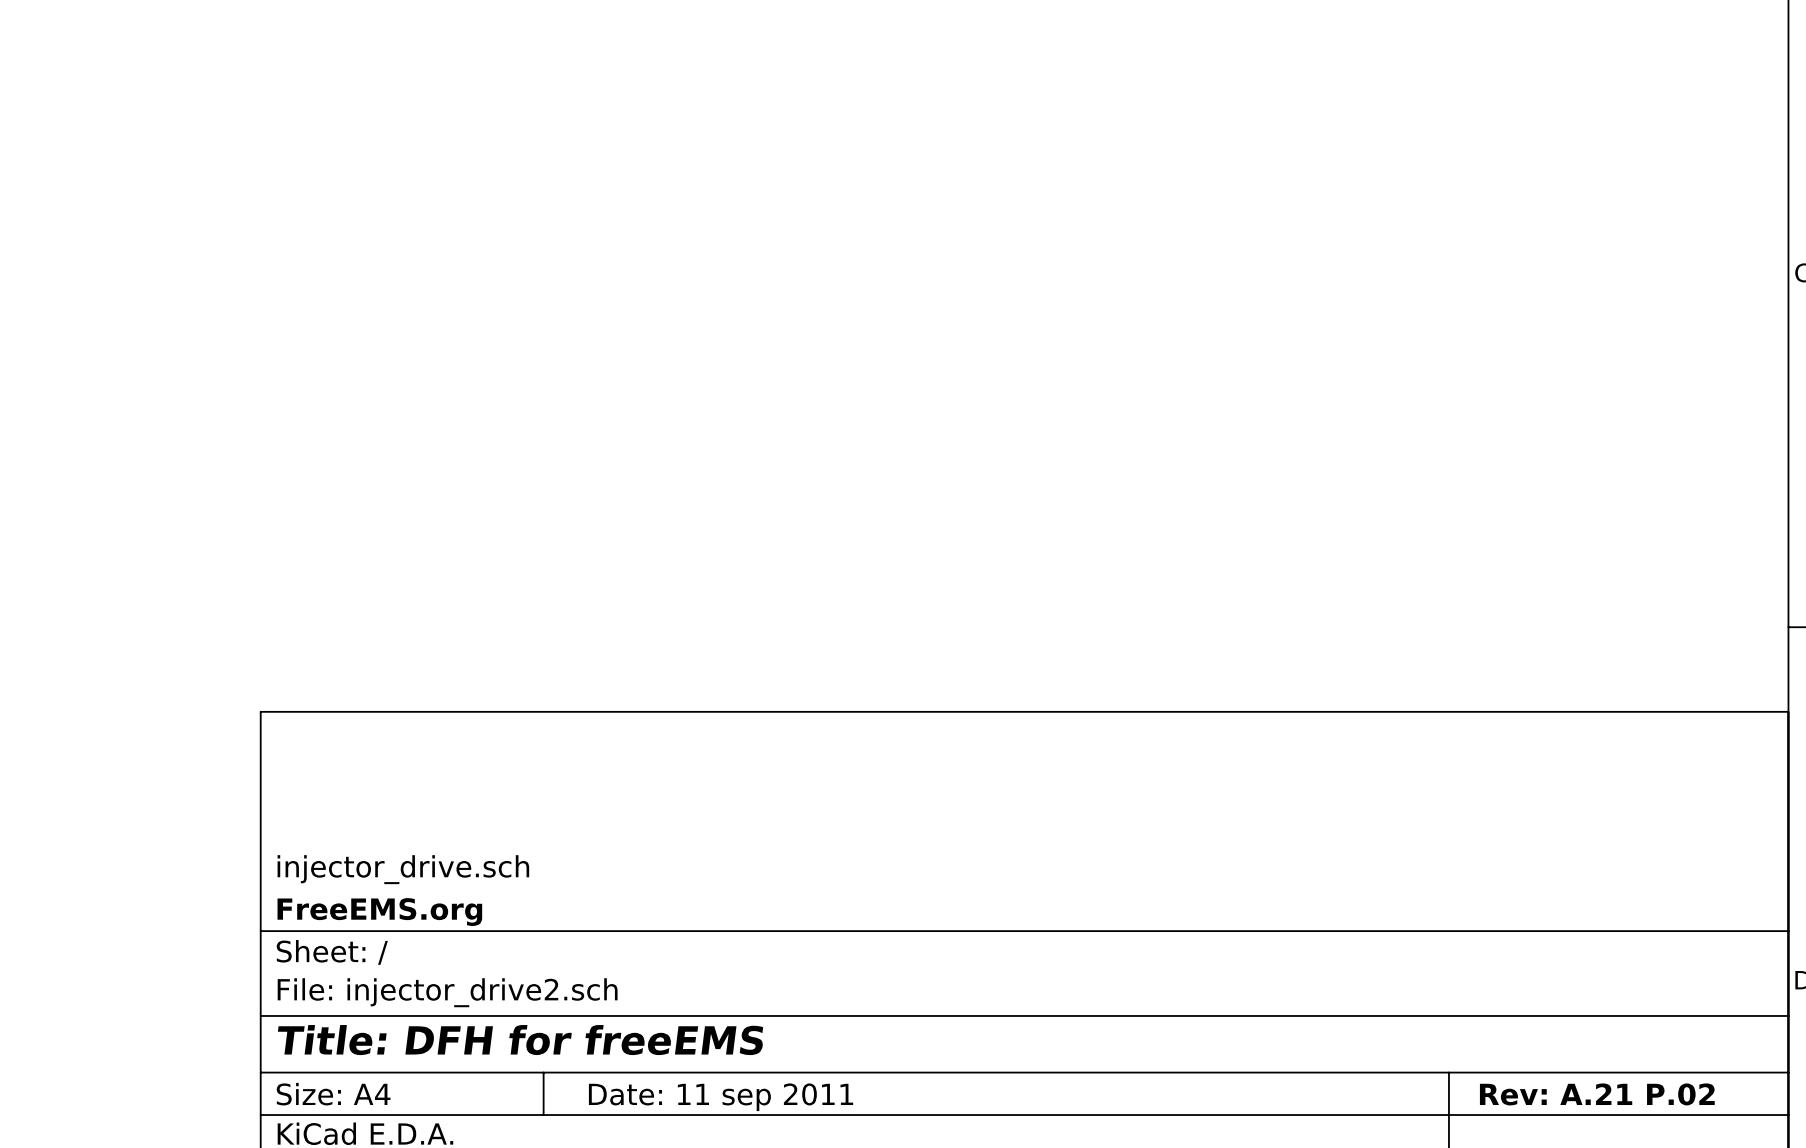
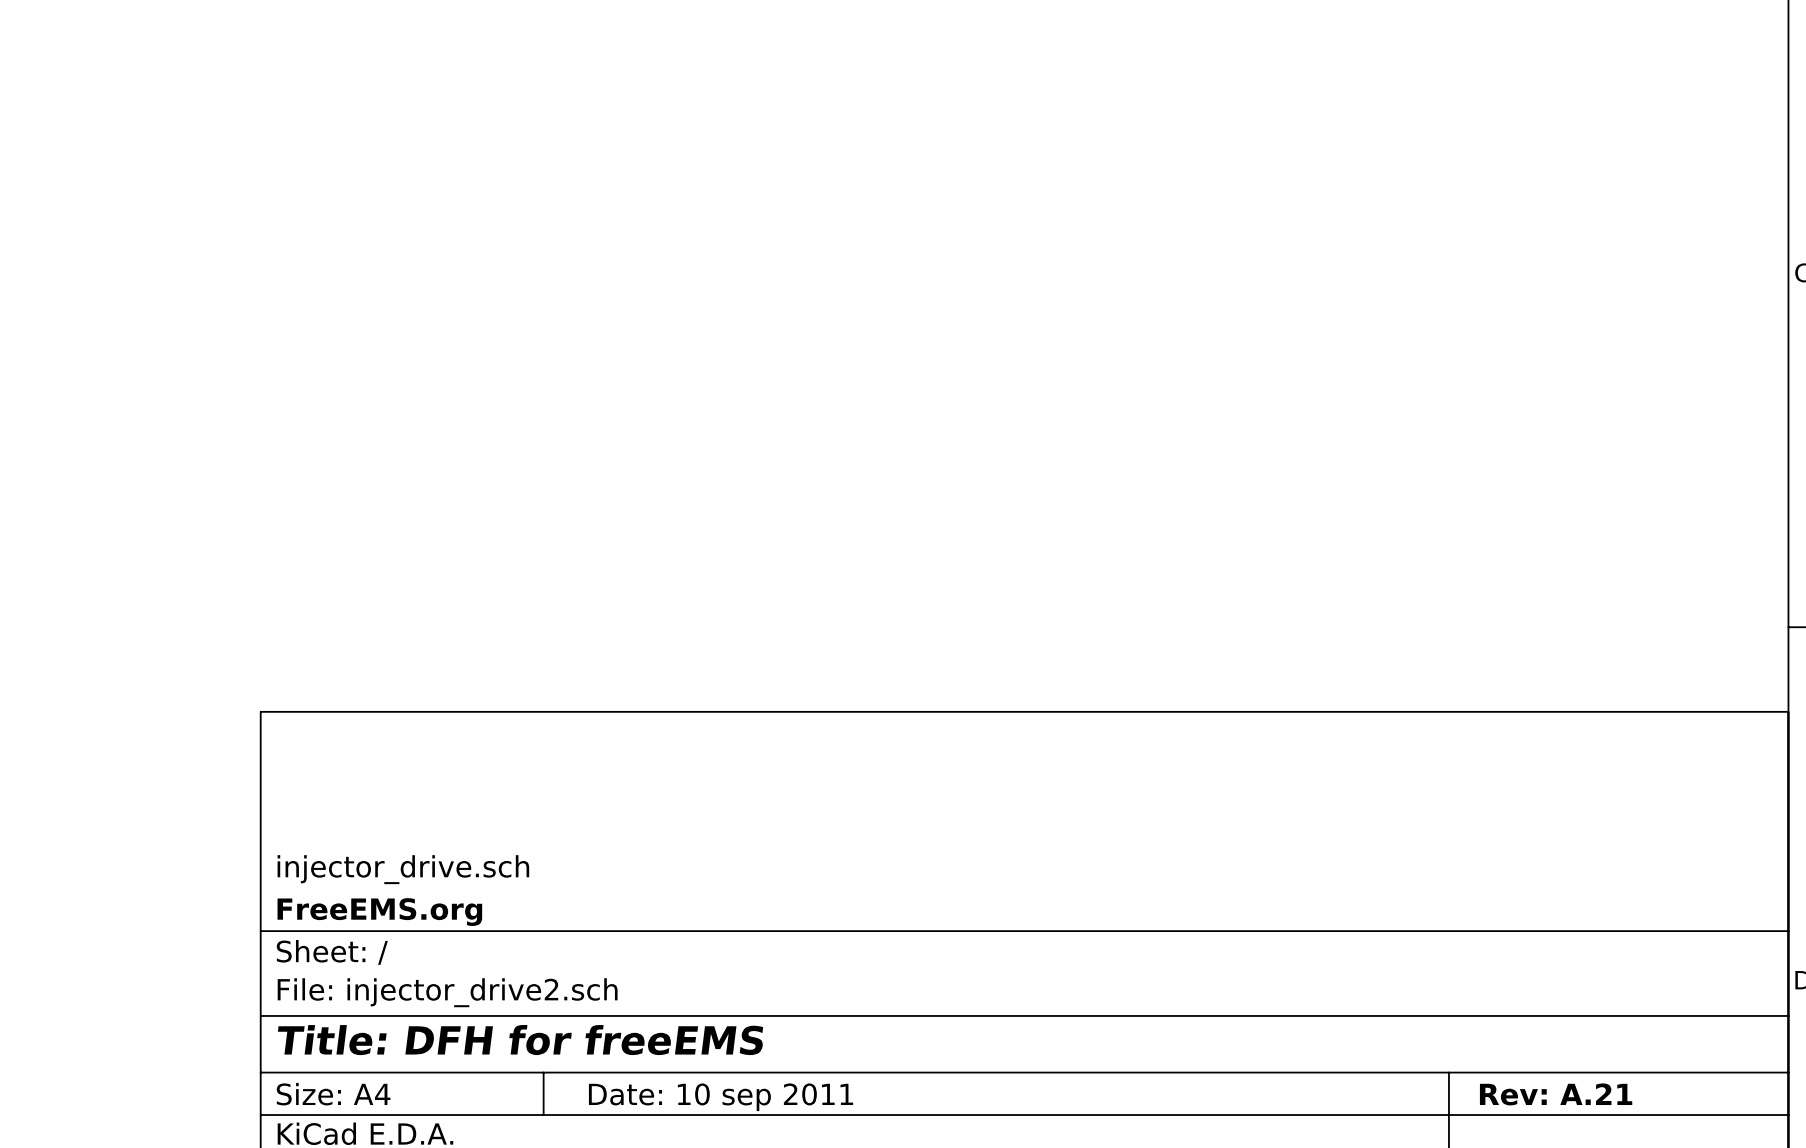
title block: Rev: A.21 P.02 (1597, 1094) -> Rev: A.21 (1556, 1094)
title block: Date: 11 sep 2011 (721, 1097) -> Date: 10 sep 2011 (721, 1097)

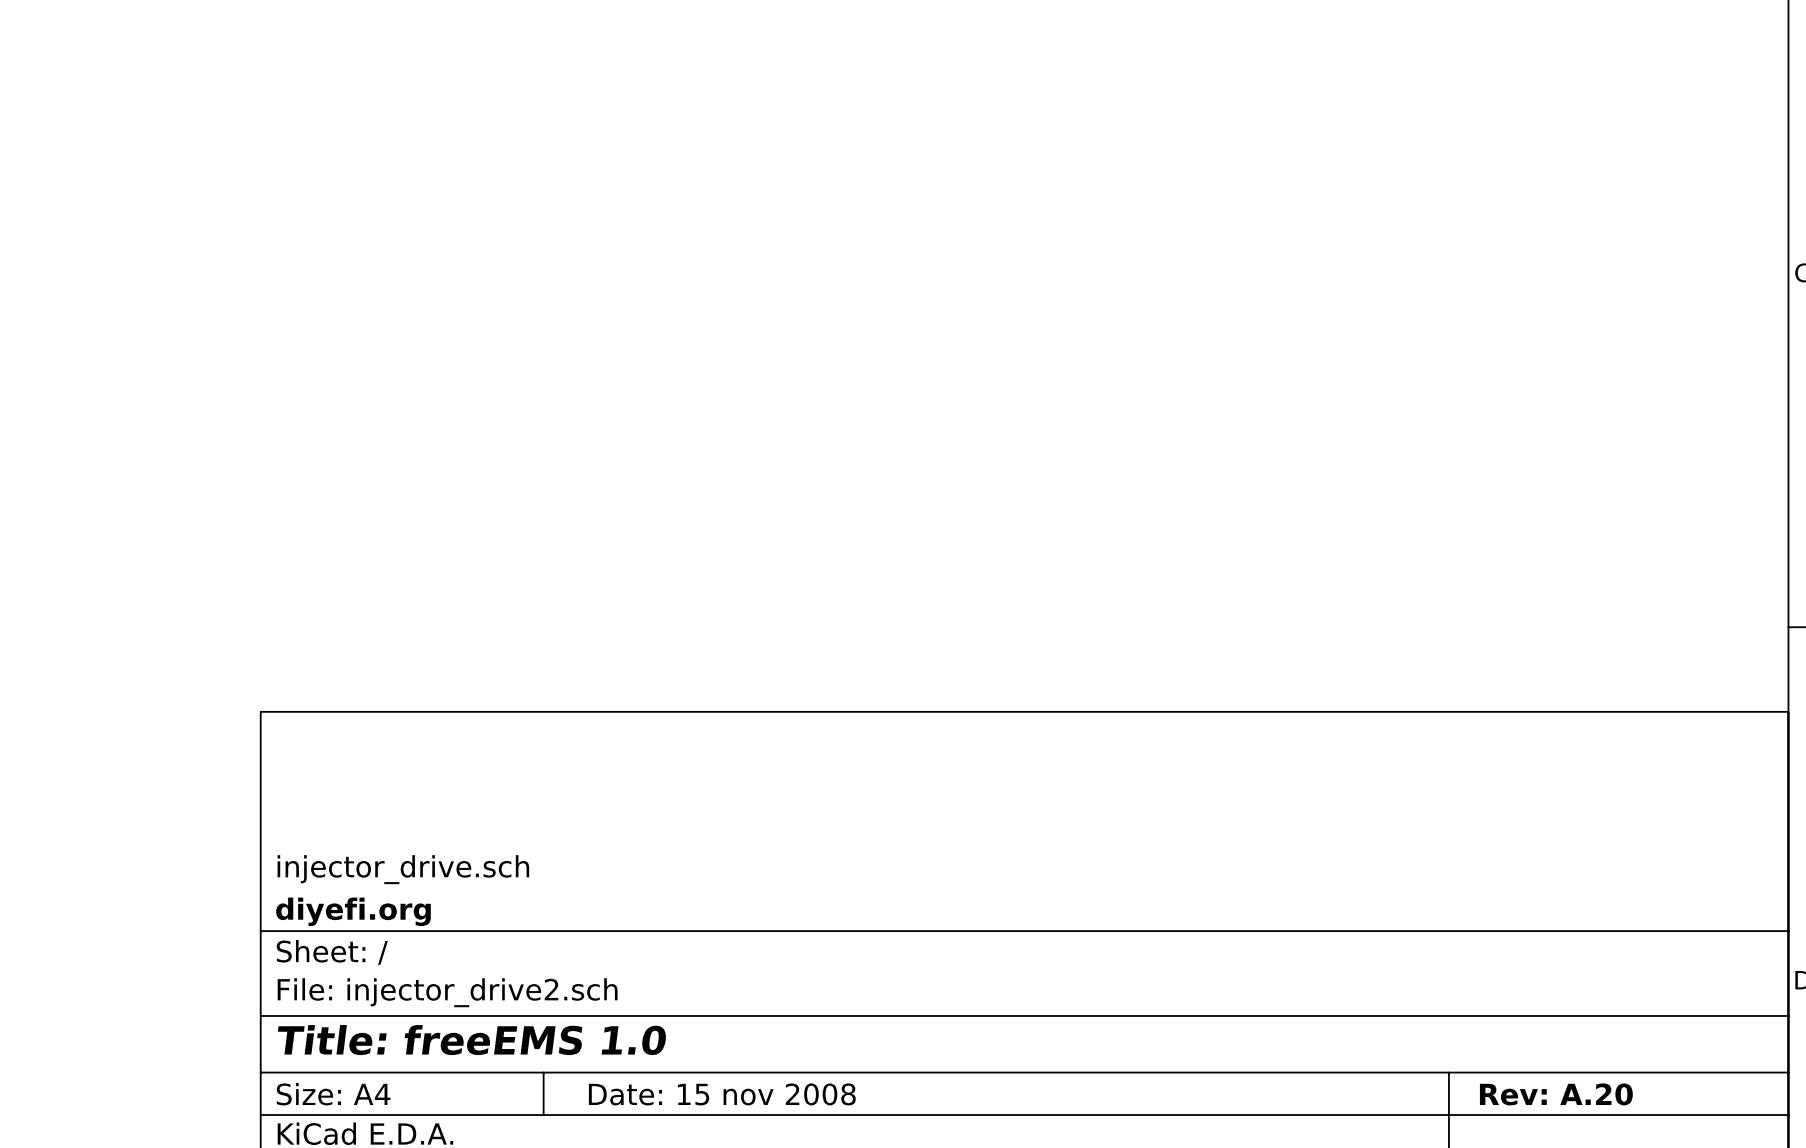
title block: FreeEMS.org (379, 912) -> diyefi.org (353, 911)
title block: Title: DFH for freeEMS (520, 1040) -> Title: freeEMS 1.0 (472, 1040)
title block: Rev: A.21 (1556, 1094) -> Rev: A.20 (1556, 1094)
title block: Date: 10 sep 2011 (721, 1097) -> Date: 15 nov 2008 (722, 1094)

